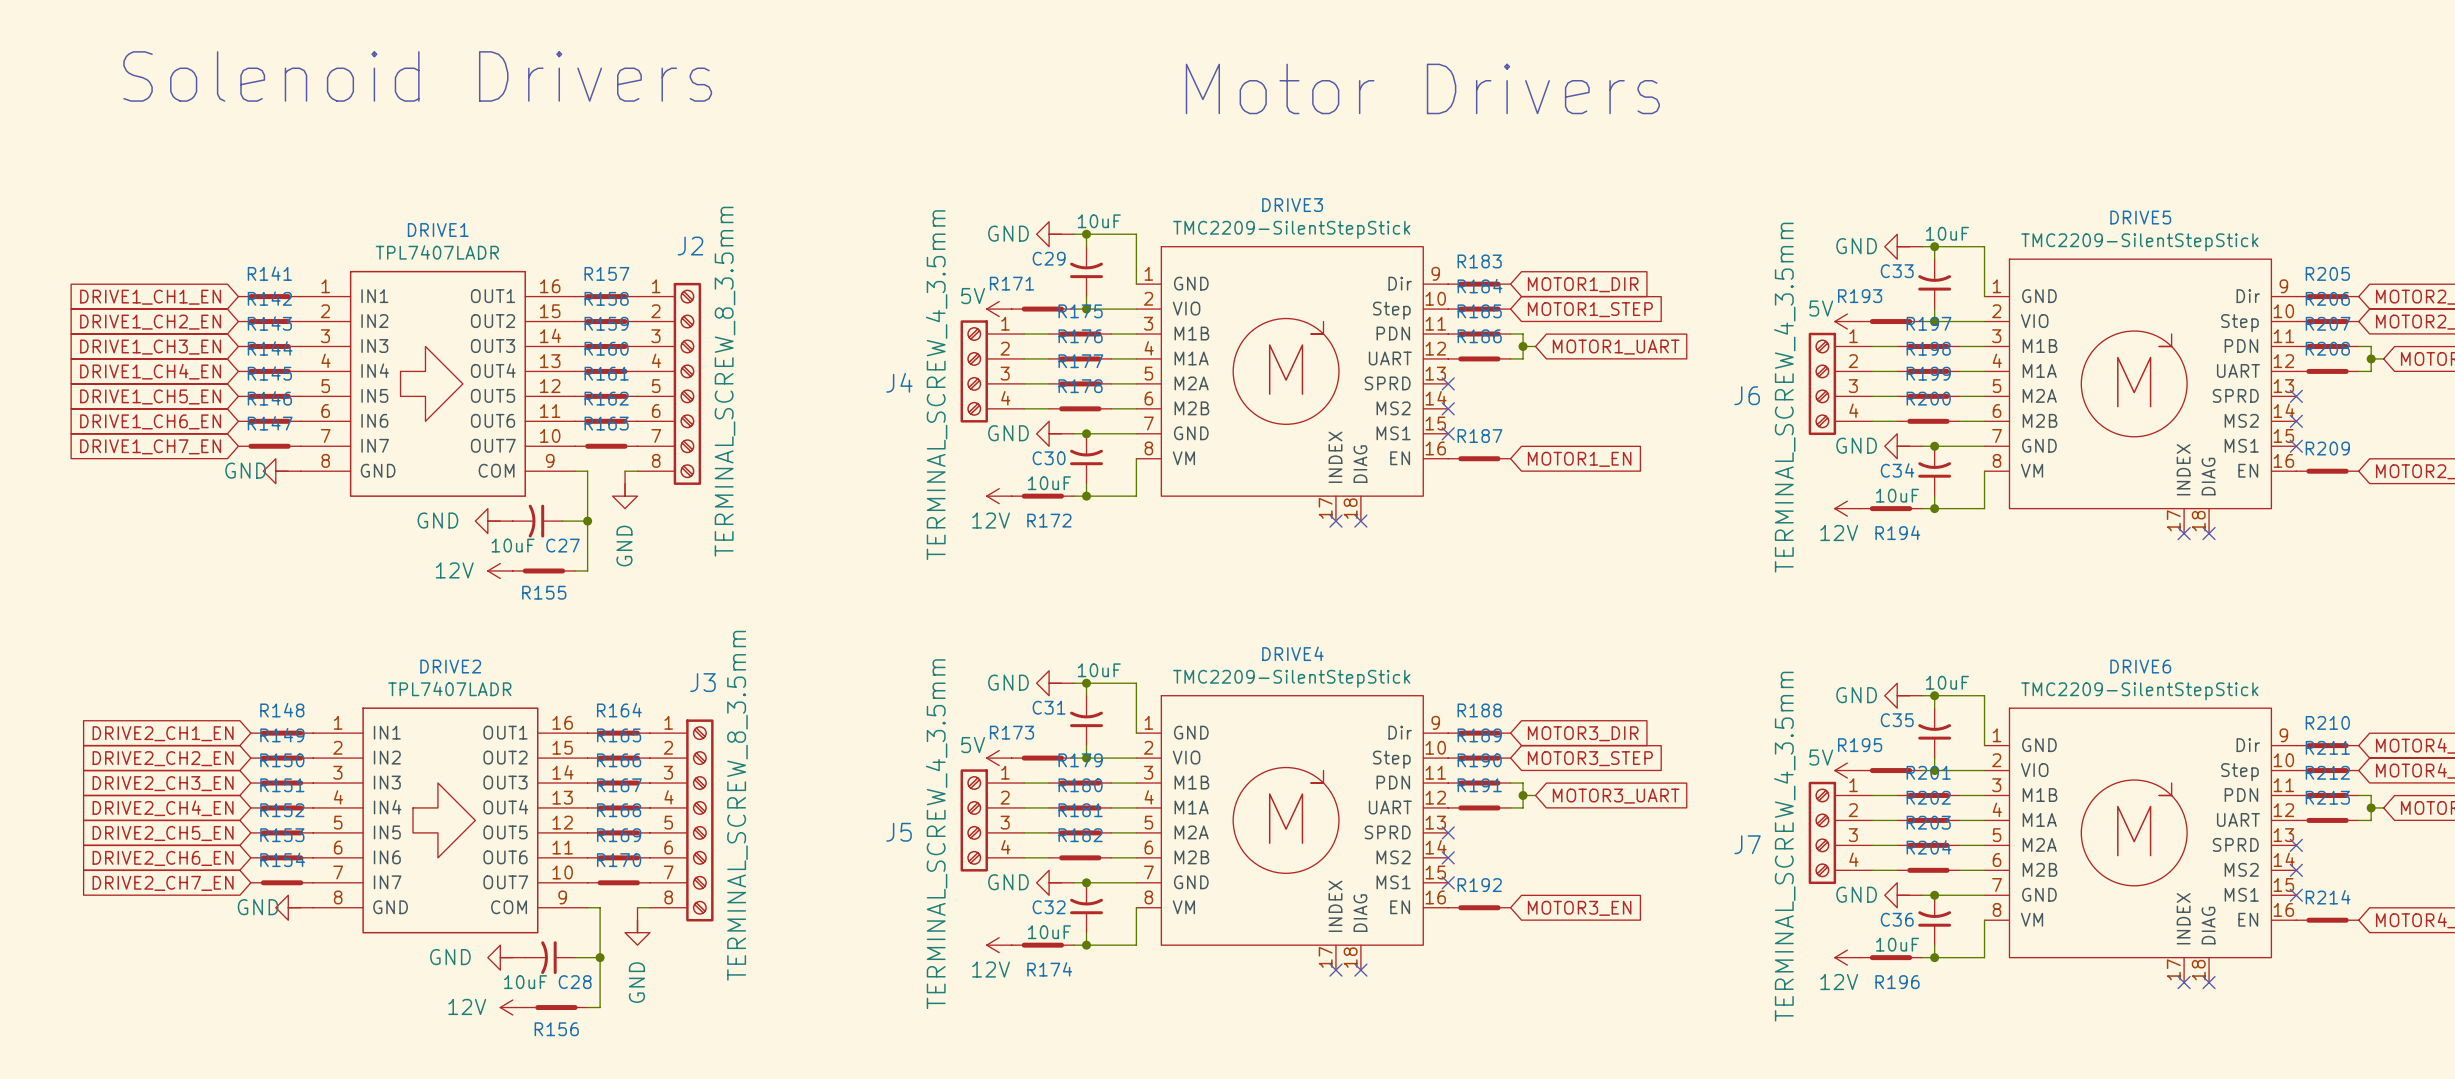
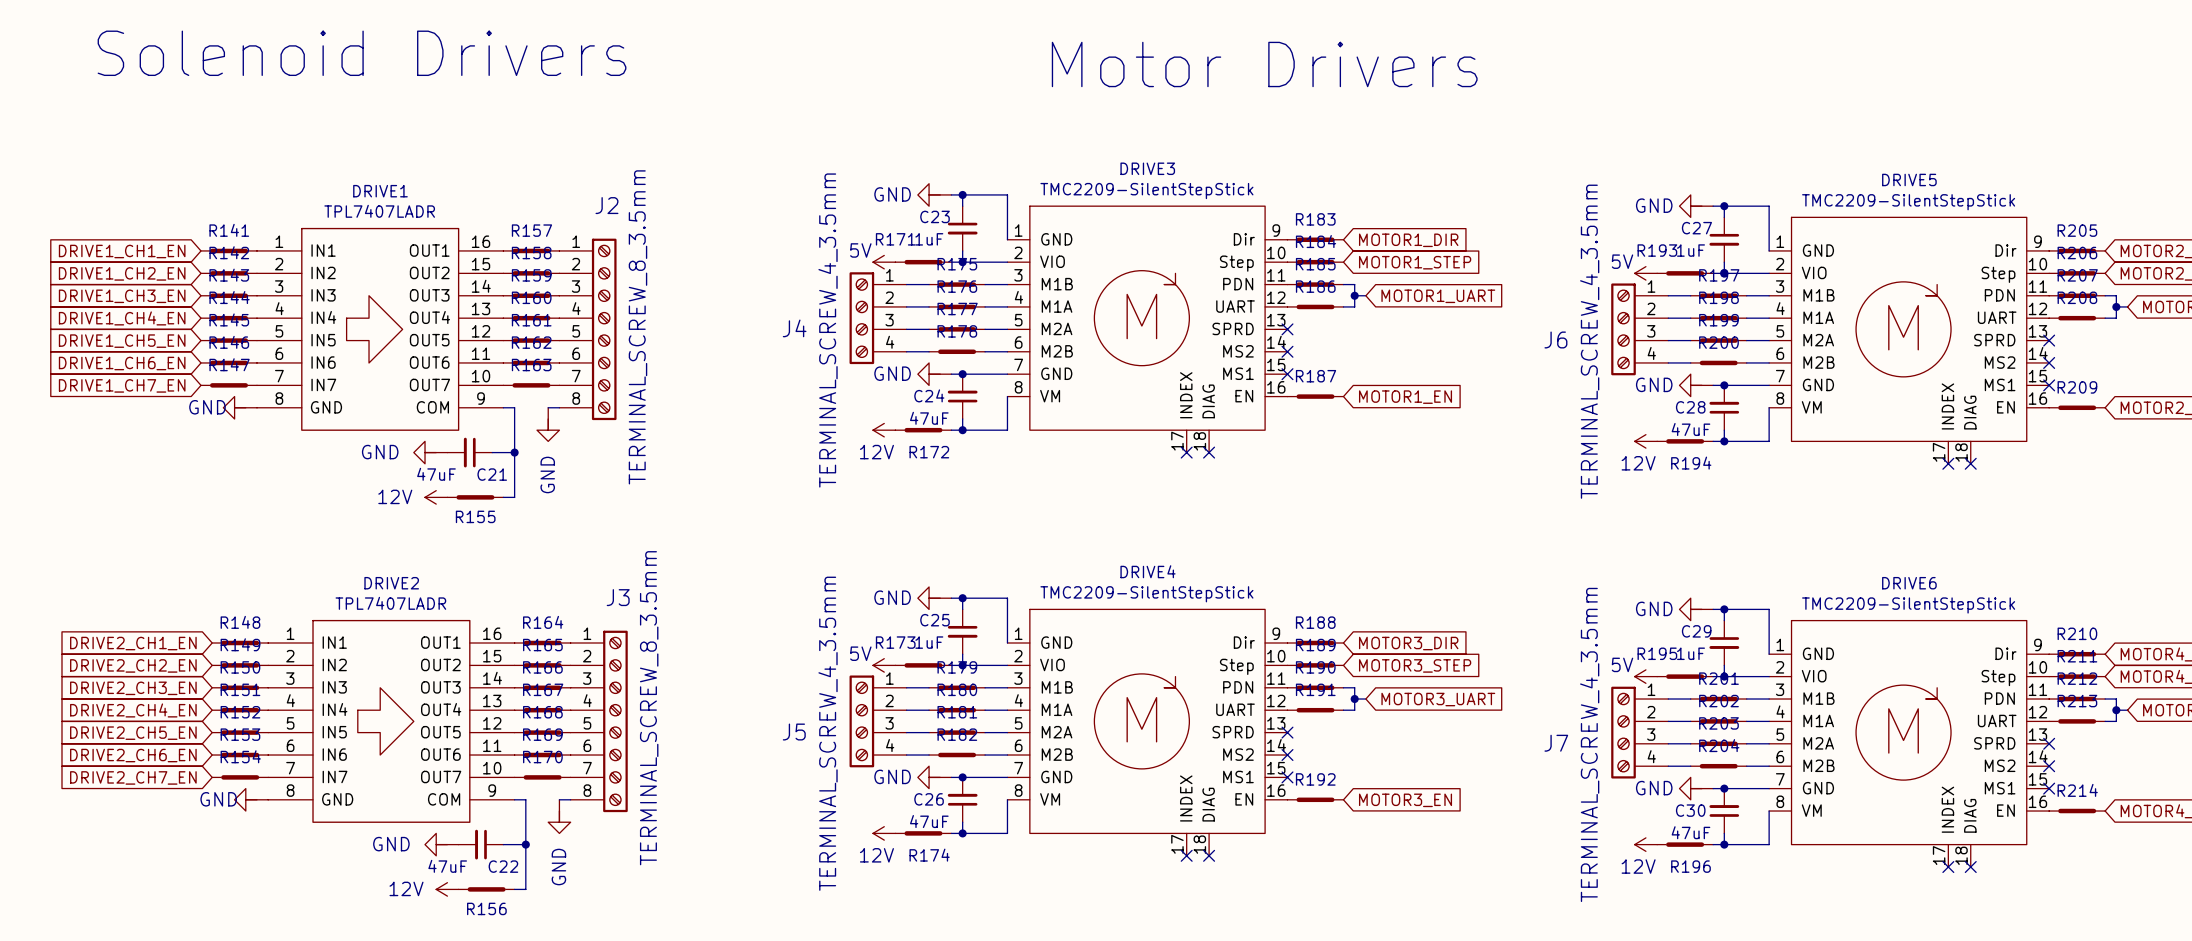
C29 text: 10uF (1099, 221) -> 1uF (1690, 653)
C29 symbol: [1070, 246, 1103, 297] -> [1709, 620, 1740, 666]
C23: none -> (962, 228)
C33: (1934, 284) -> none
C30 symbol: [1070, 433, 1103, 484] -> [1709, 788, 1740, 834]
C24: none -> (962, 396)
C34: (1934, 471) -> none
C30 text: 10uF (1049, 483) -> 47uF (1690, 832)
C27 symbol: [512, 504, 563, 538] -> [1709, 217, 1740, 263]
C21: none -> (469, 452)
C27 text: 10uF (513, 545) -> 1uF (1690, 250)
C27 name position: C27 (562, 545) -> C27 (1696, 228)
C31: (1086, 720) -> none
C25: none -> (962, 631)
C35: (1934, 733) -> none
C32: (1086, 907) -> none
C26: none -> (962, 799)
C36: (1934, 920) -> none
C28 symbol: [525, 941, 576, 975] -> [1709, 385, 1740, 431]
C22: none -> (481, 844)
C28 text: 10uF (525, 982) -> 47uF (1690, 429)
C28 name position: C28 (575, 982) -> C28 (1690, 407)

